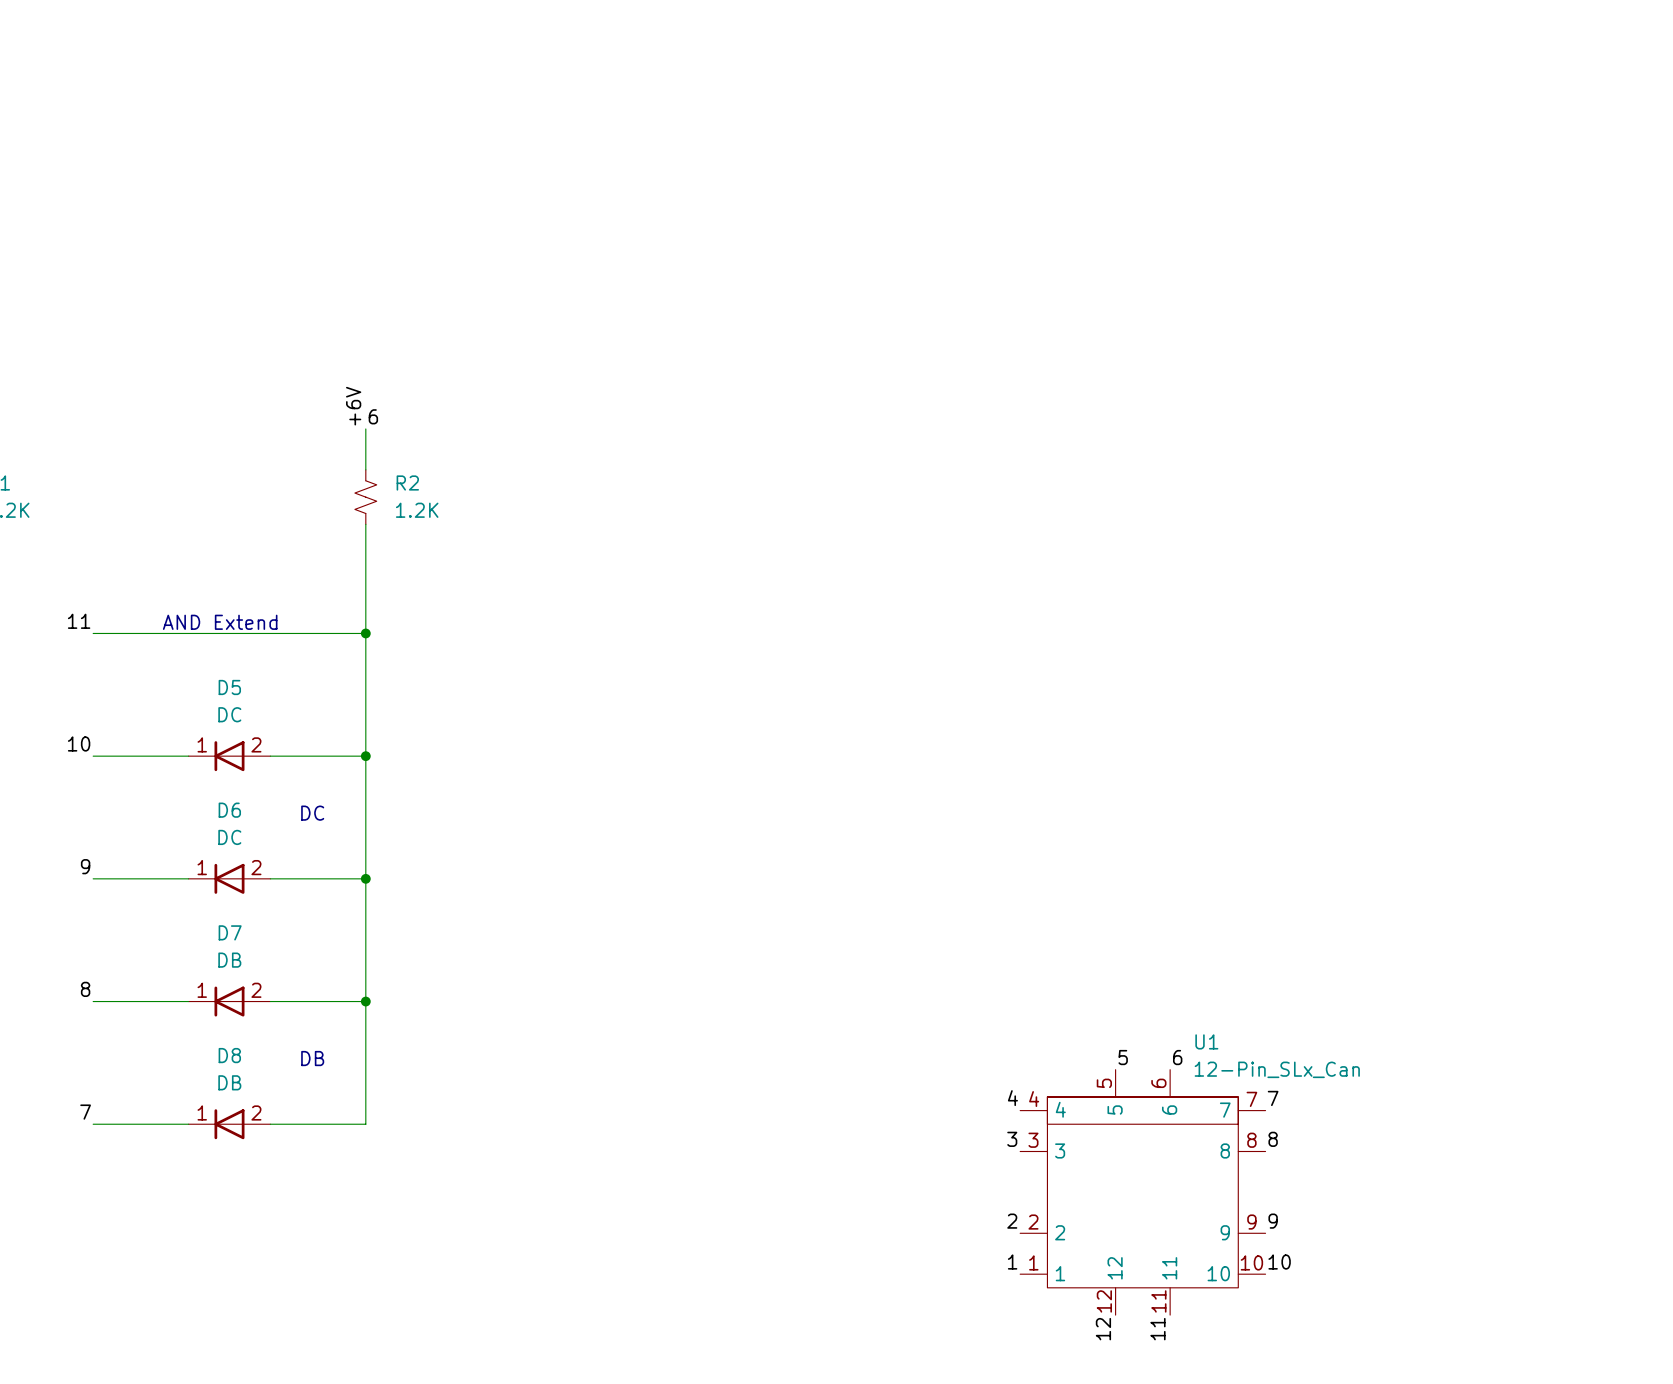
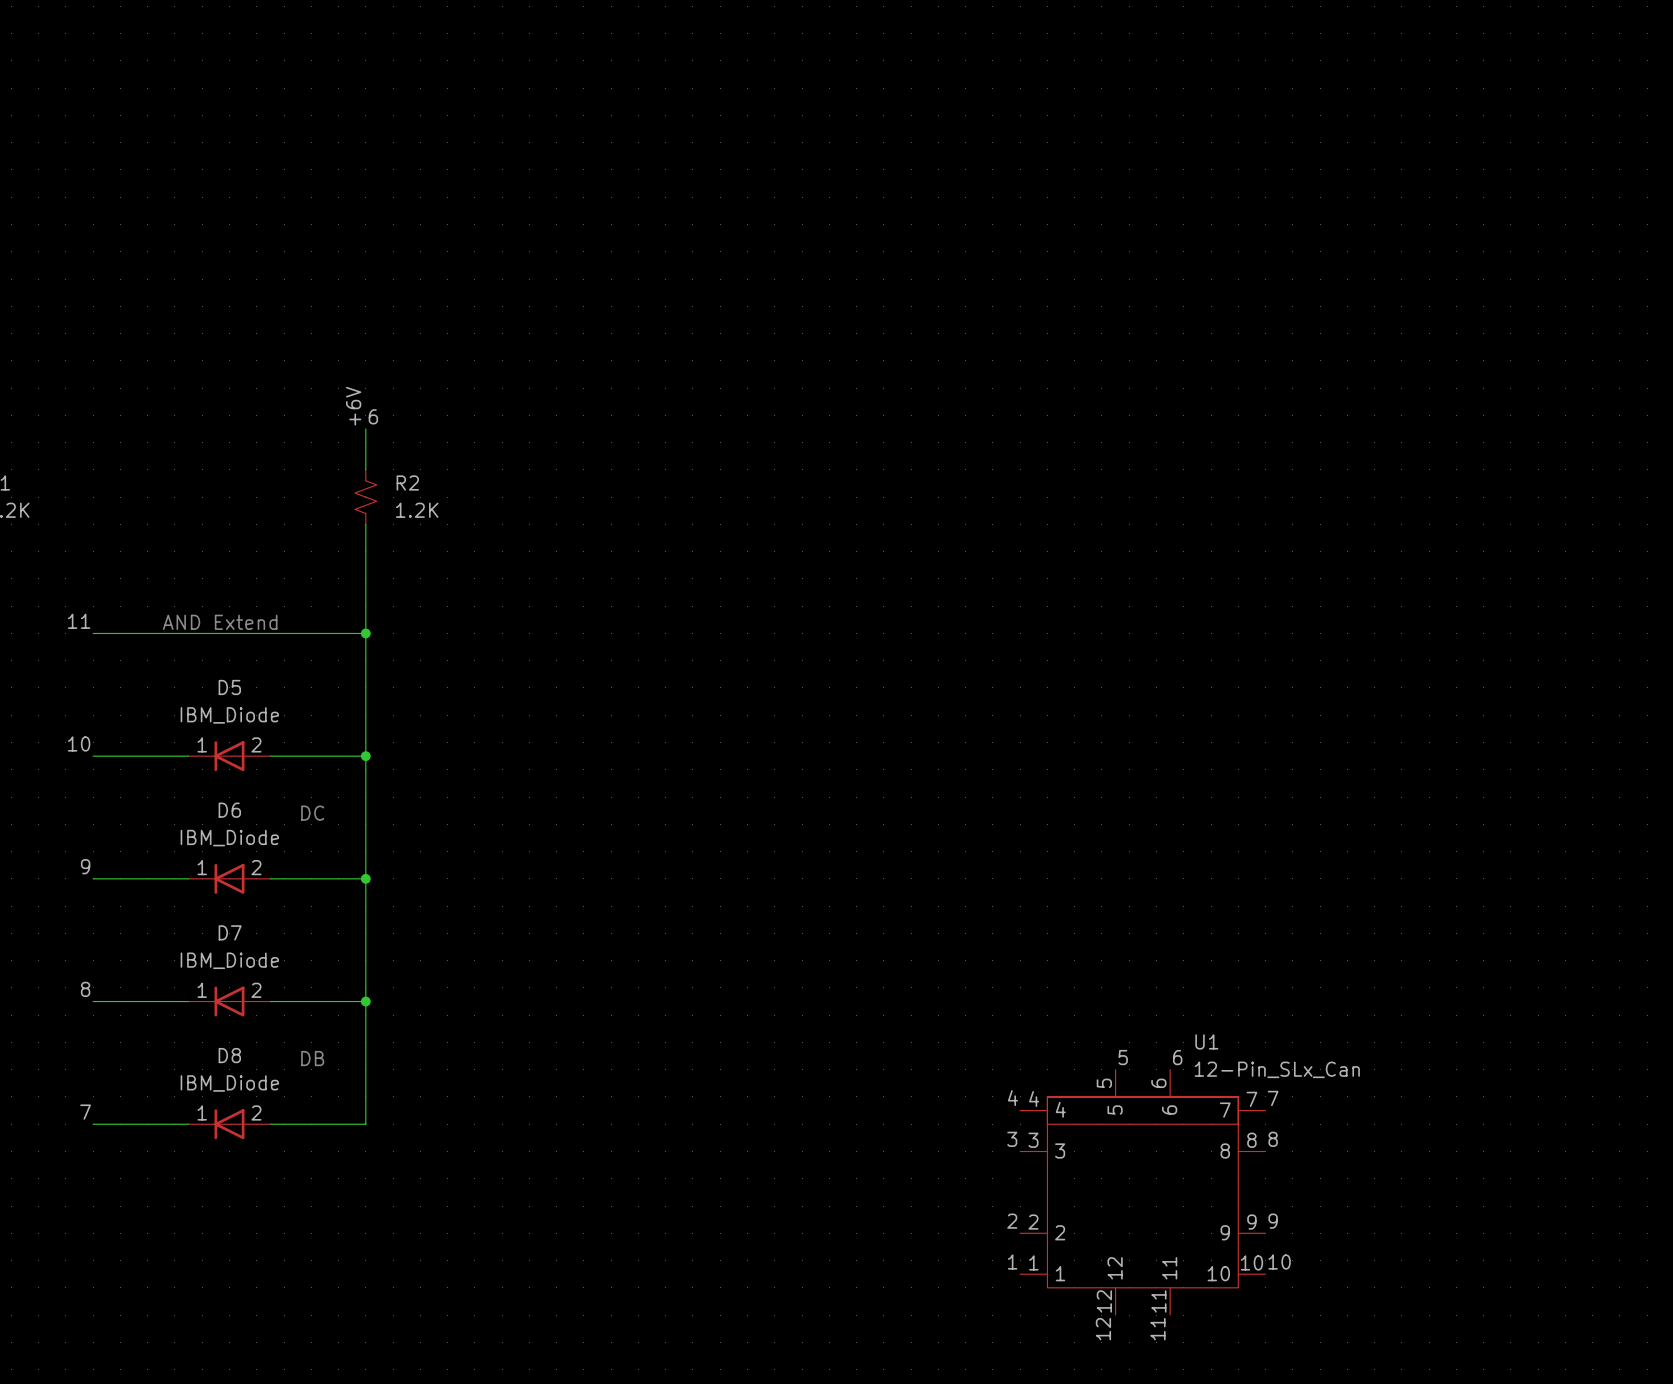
D5 value: DC (229, 714) -> IBM_Diode (229, 715)
D6 value: DC (229, 837) -> IBM_Diode (229, 838)
D7 value: DB (229, 960) -> IBM_Diode (229, 960)
D8 value: DB (229, 1082) -> IBM_Diode (229, 1083)

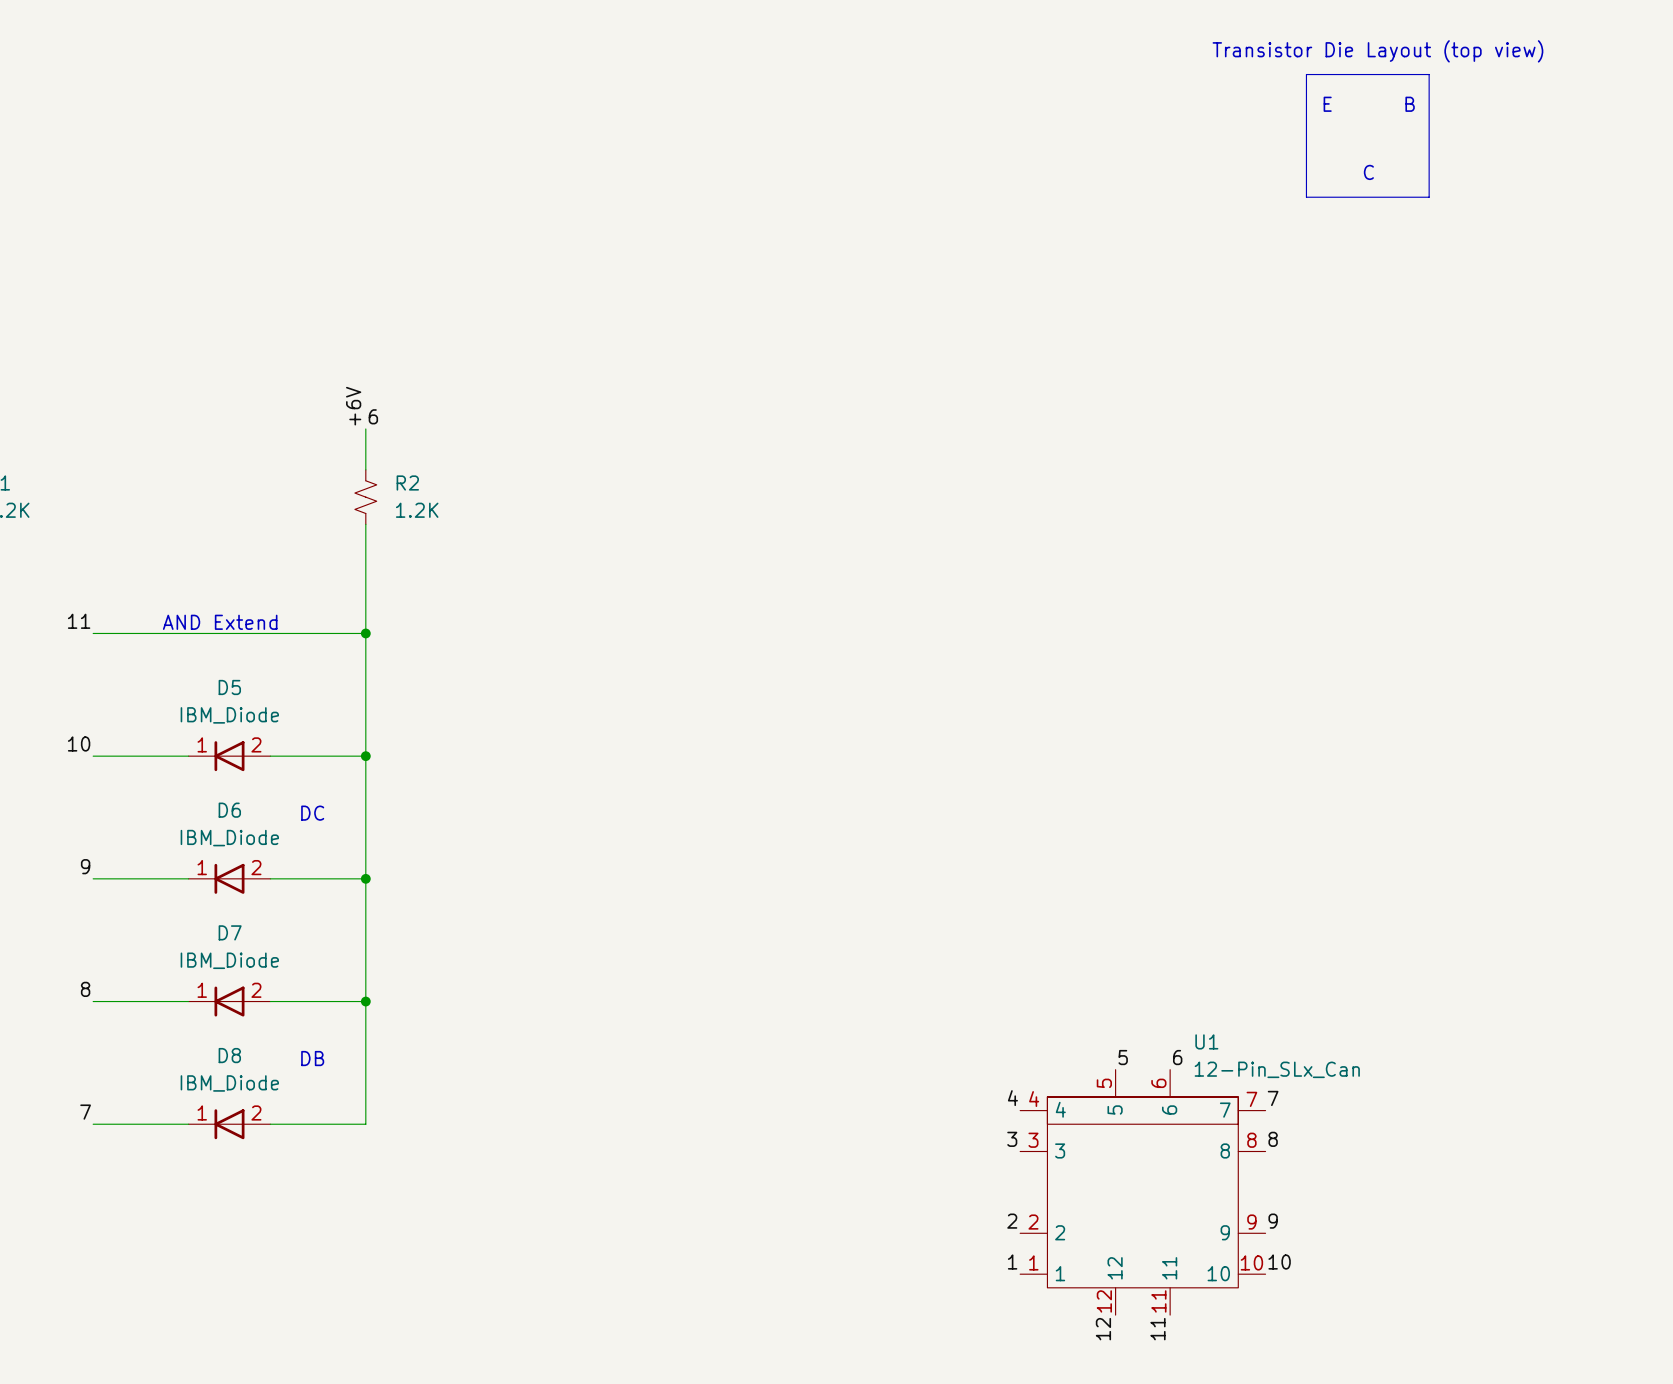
text: none -> Transistor Die Layout (top view) (1377, 51)
line: none -> (1306, 74) (1306, 197) (1429, 197) (1429, 74) (1306, 74)
text: none -> E (1327, 104)
text: none -> B (1410, 104)
text: none -> C (1368, 172)

